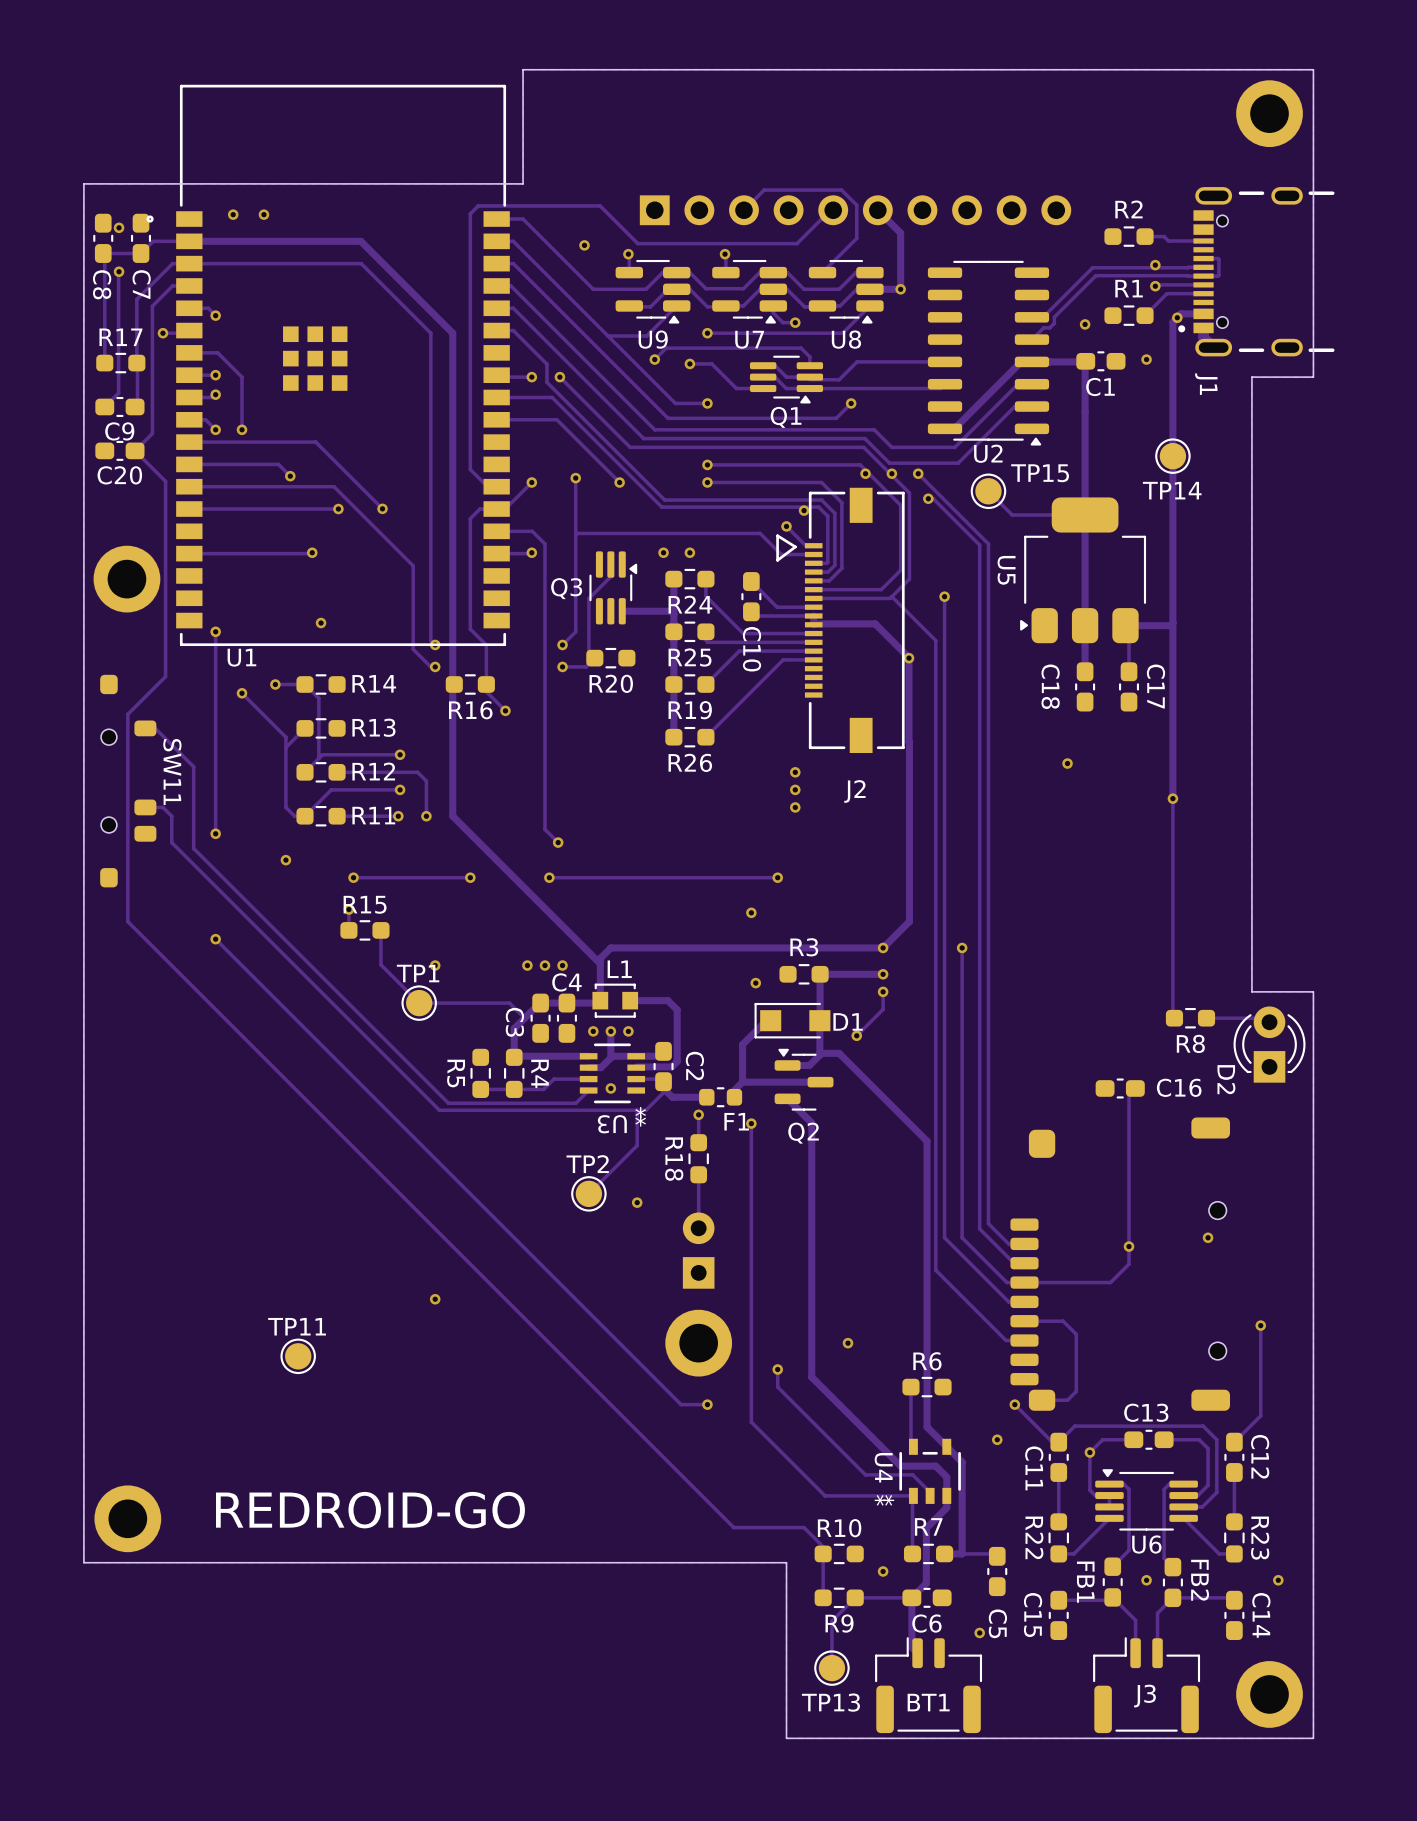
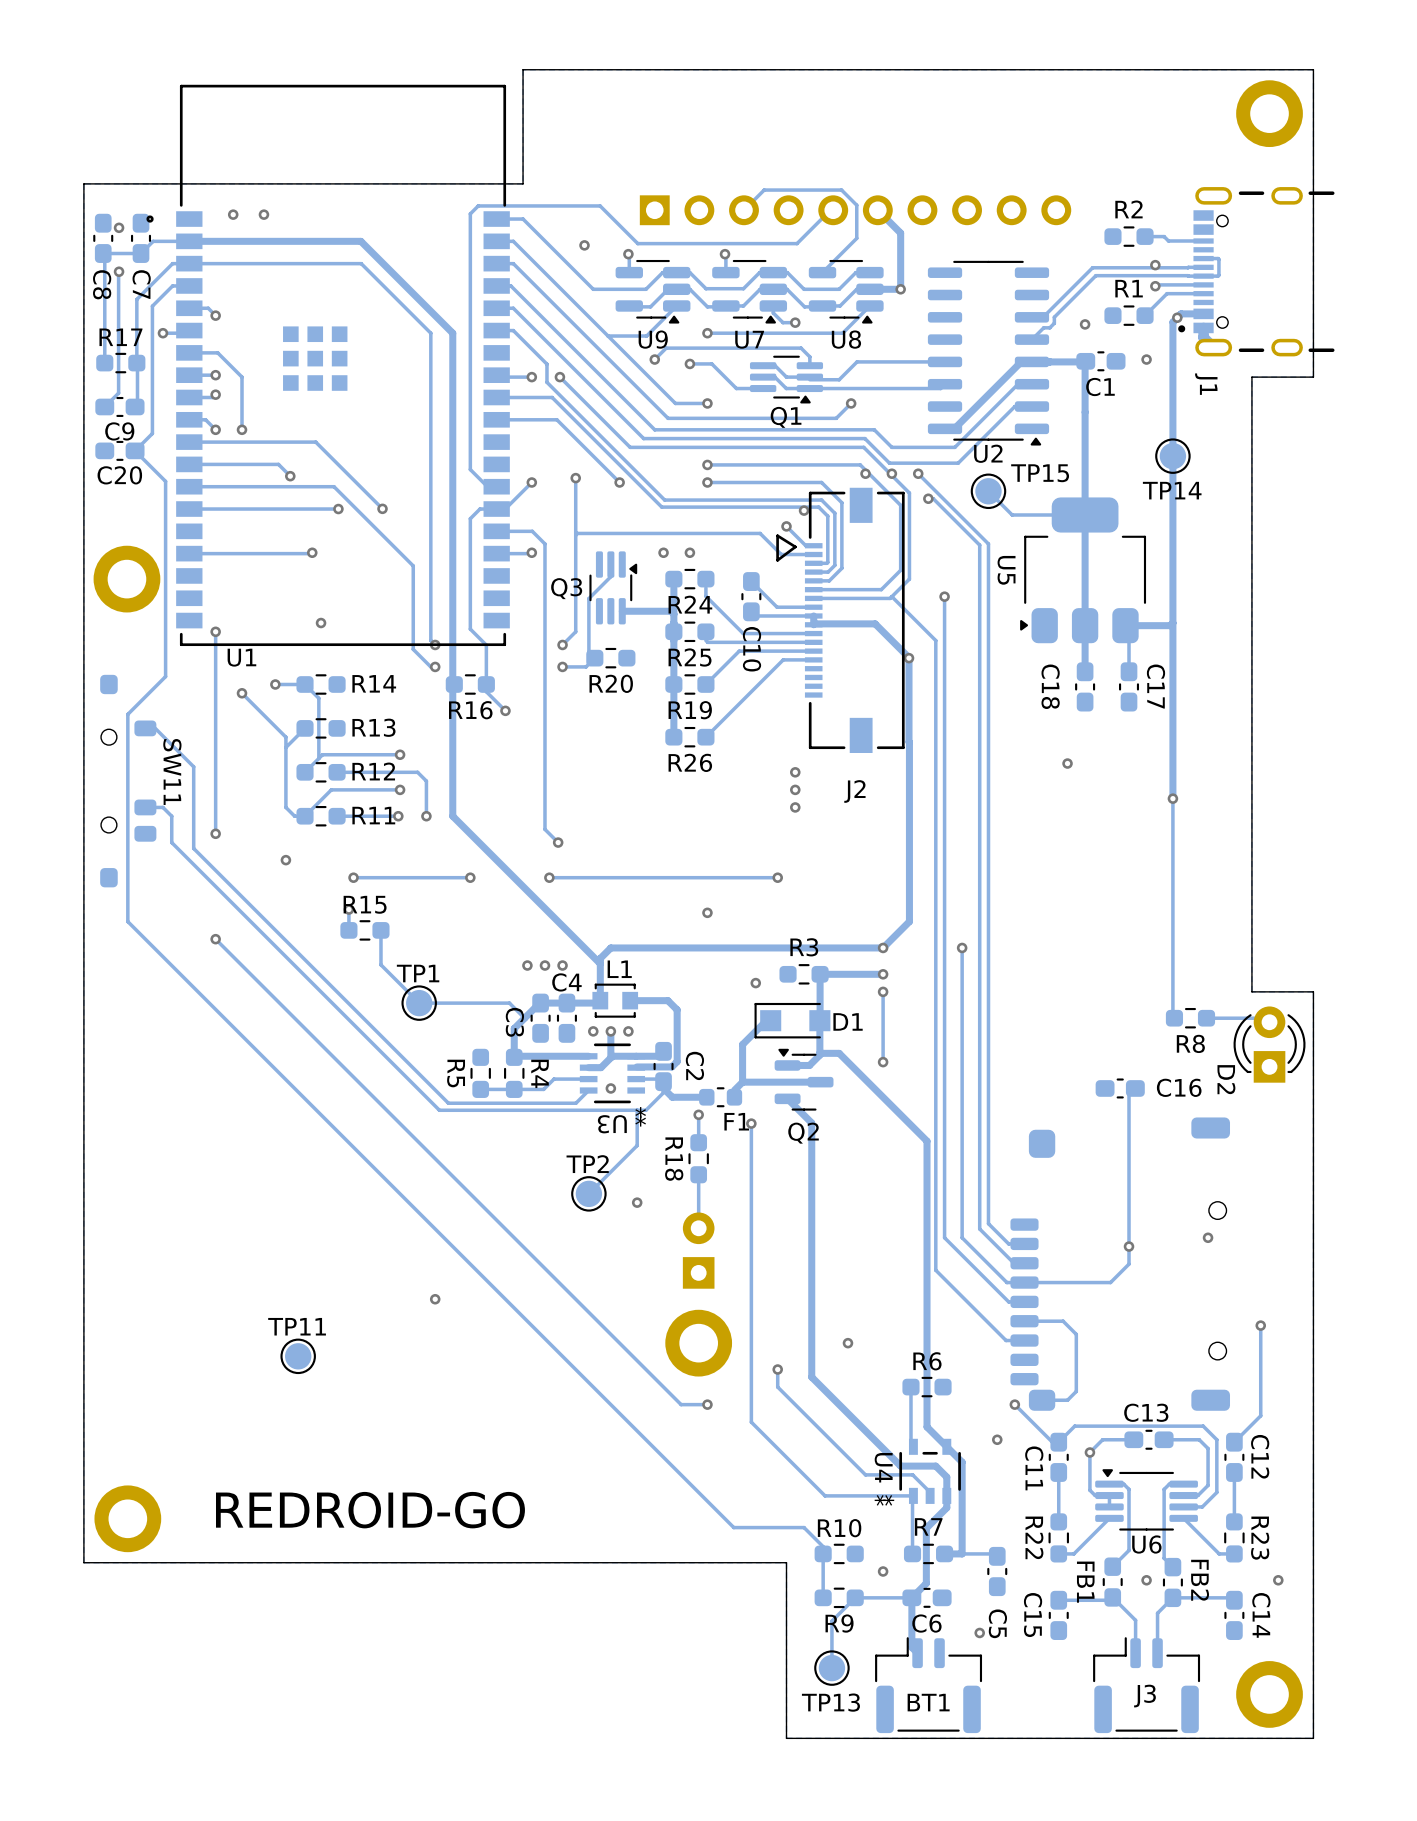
via position: (751, 912) -> (707, 912)
via: (435, 965) -> none
track: (883, 1009) (856, 1035) -> (883, 1009) (883, 1062)
via position: (856, 1035) -> (883, 1062)

